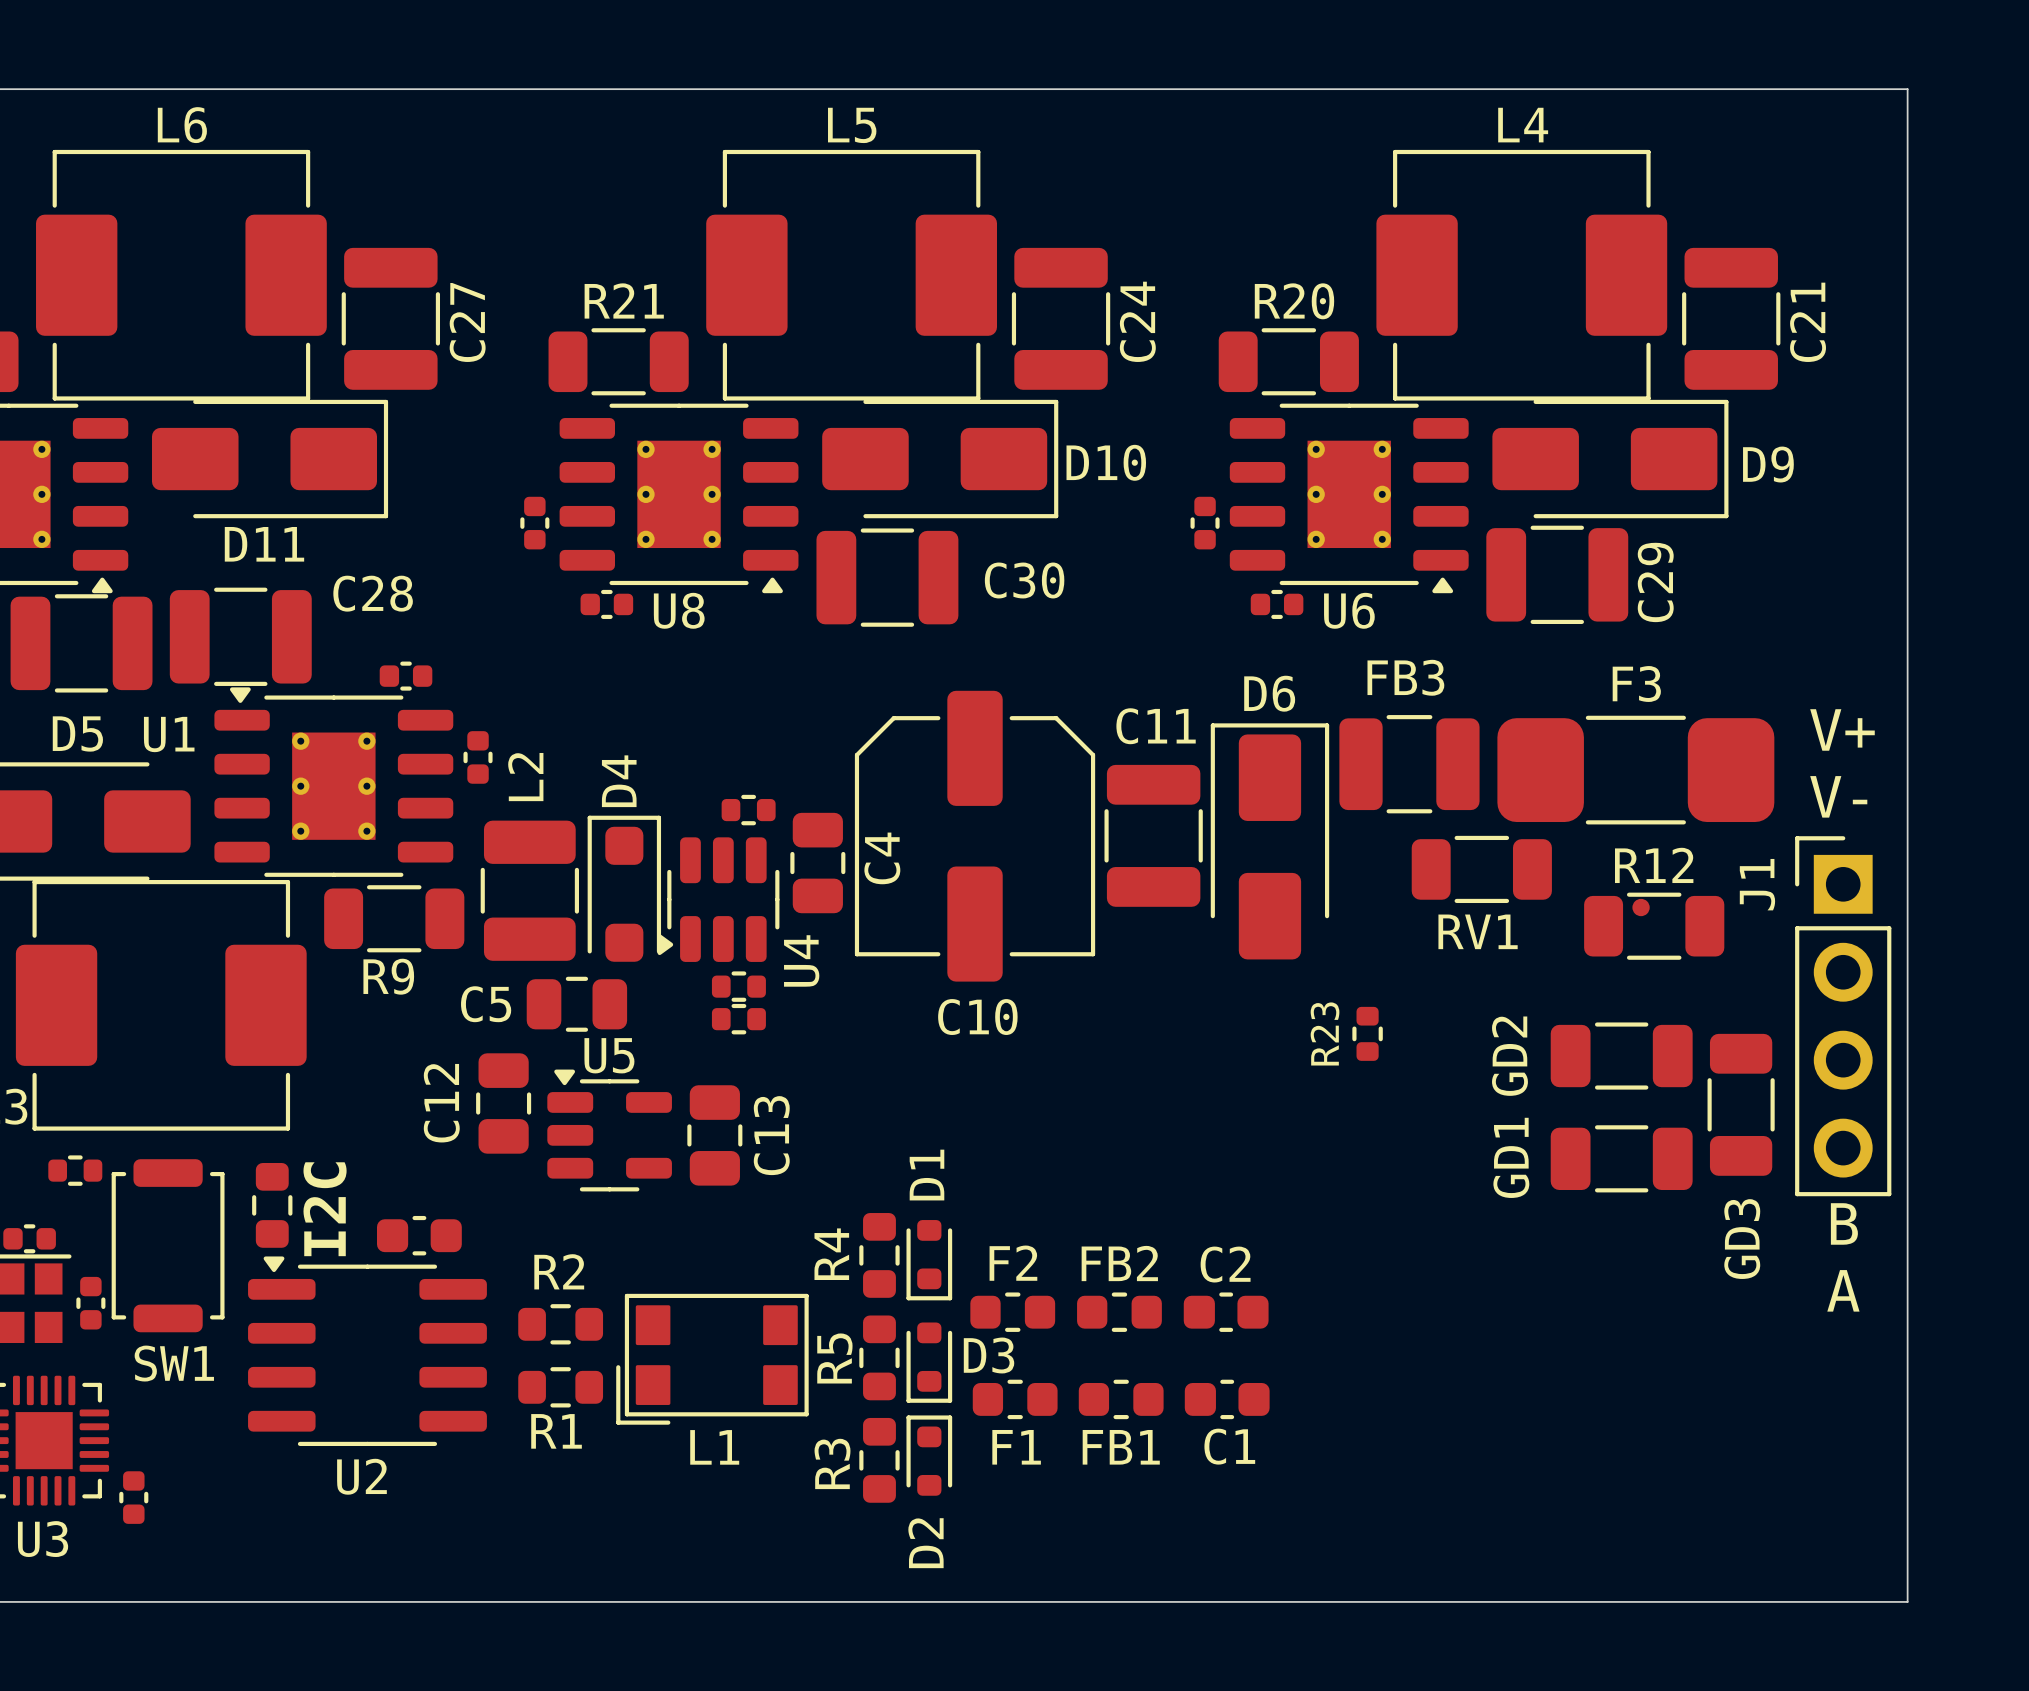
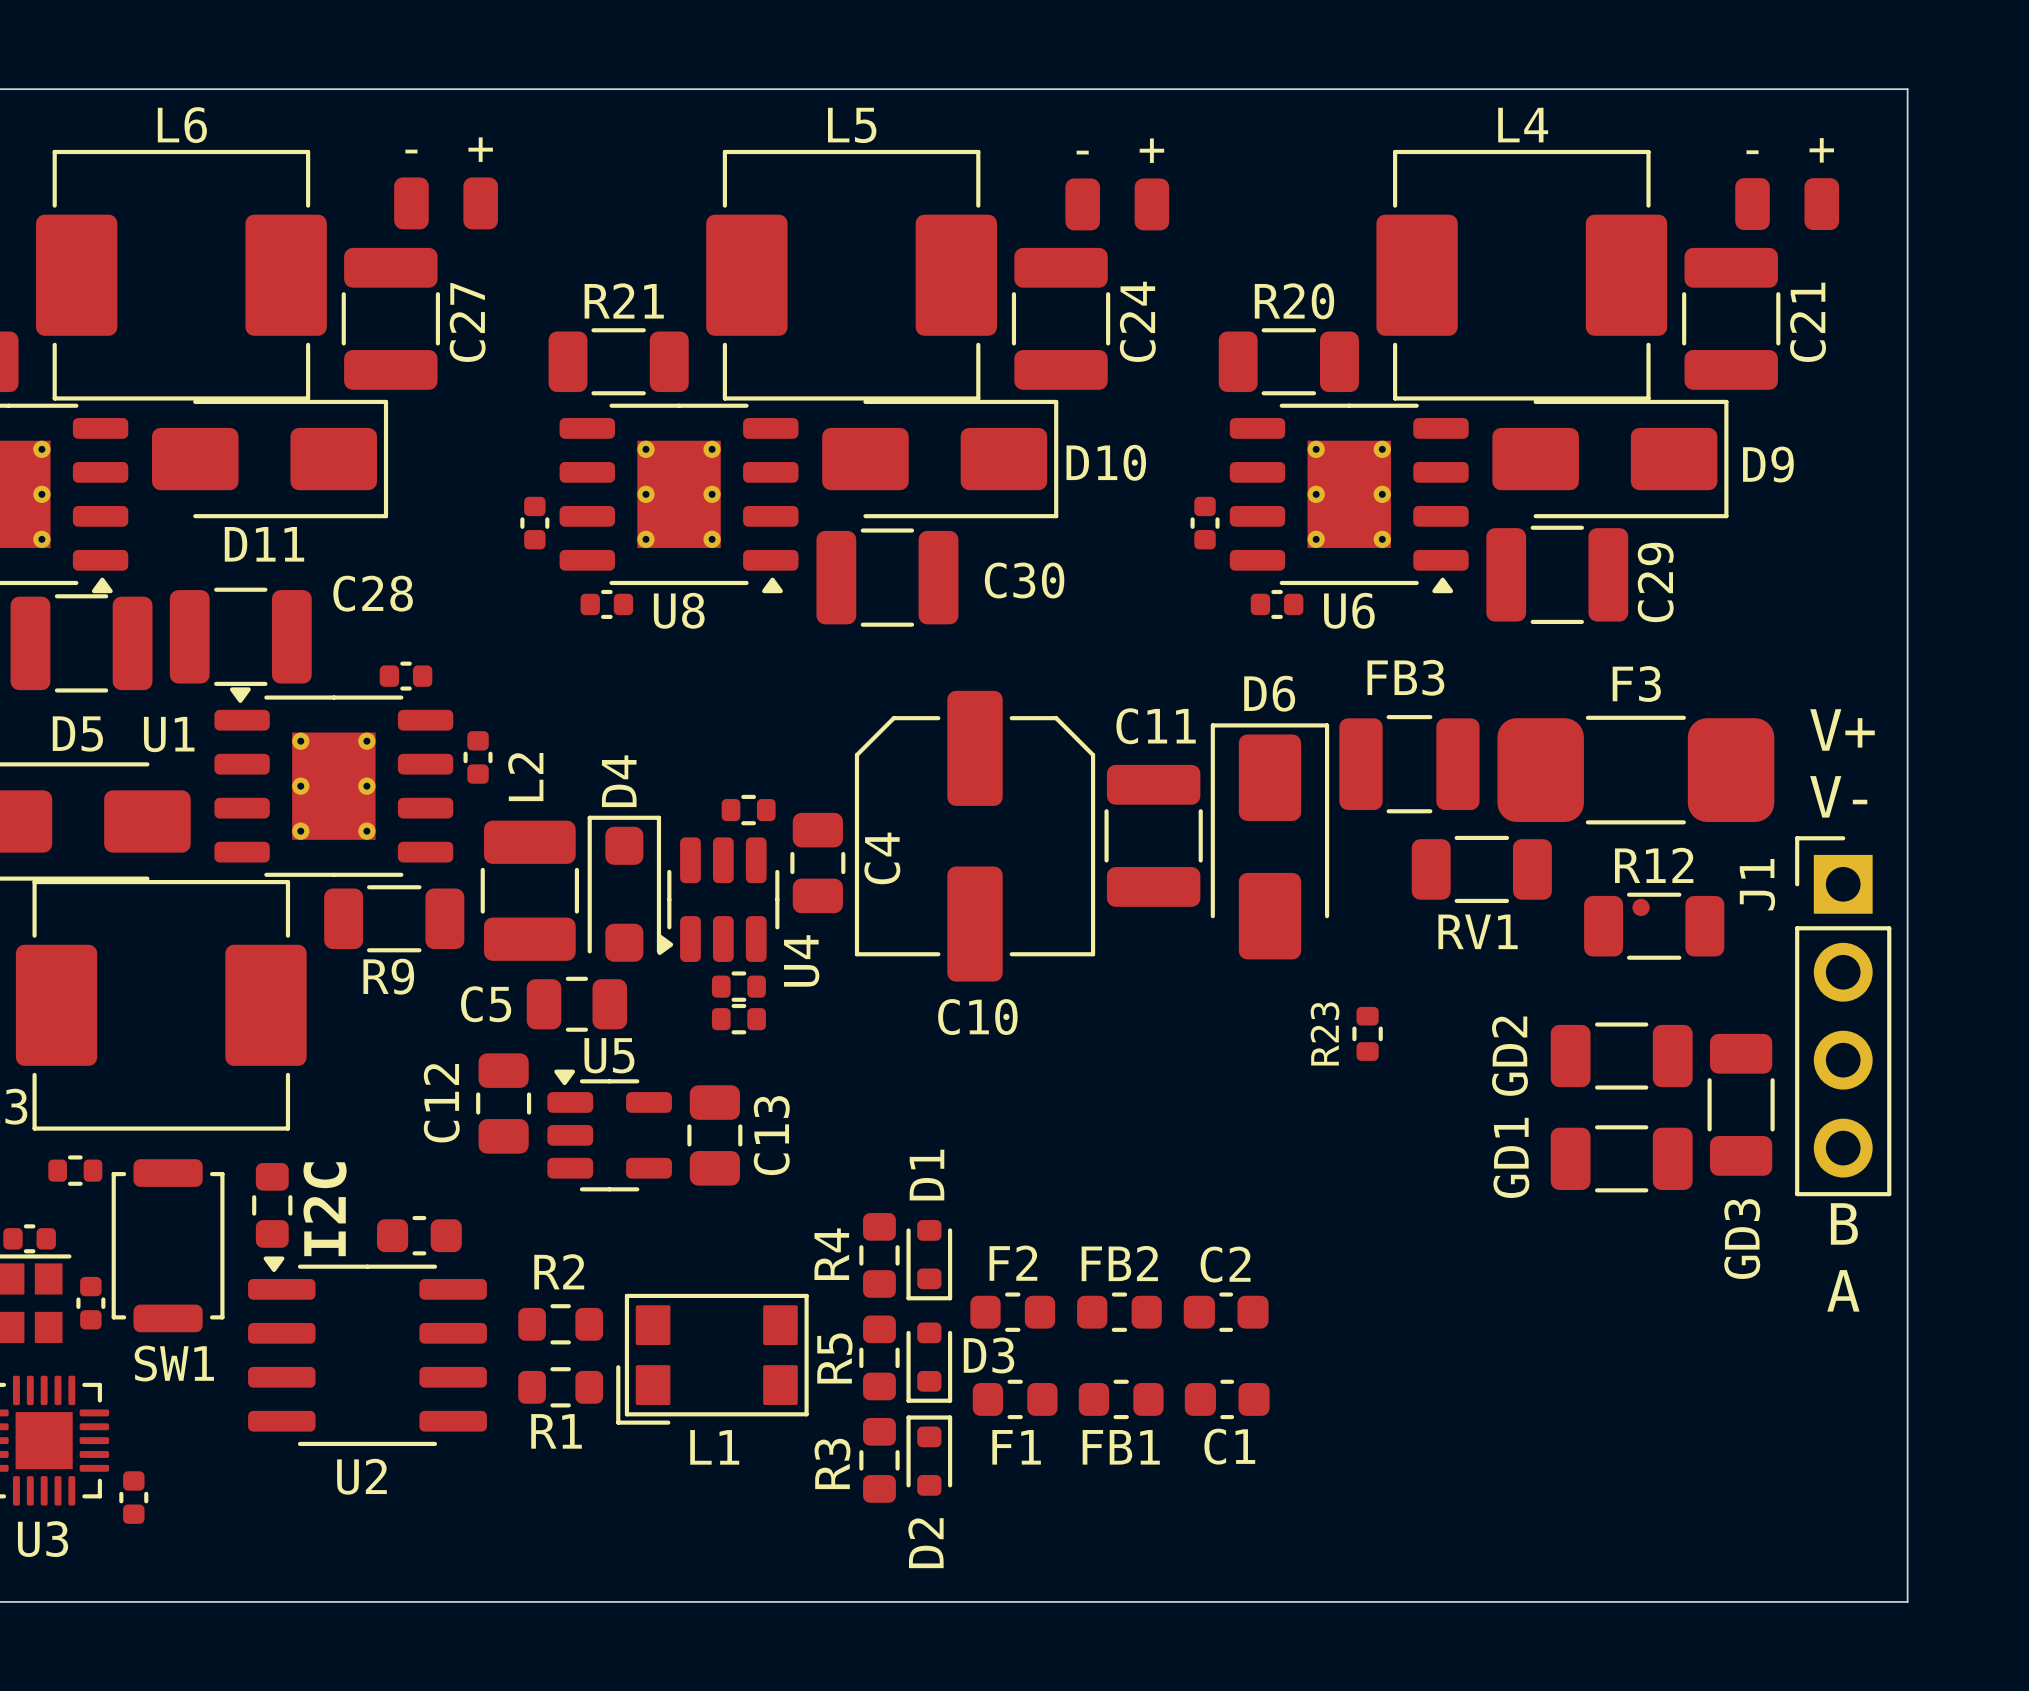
part: none -> (446, 203)
part: none -> (1117, 204)
part: none -> (1787, 204)

